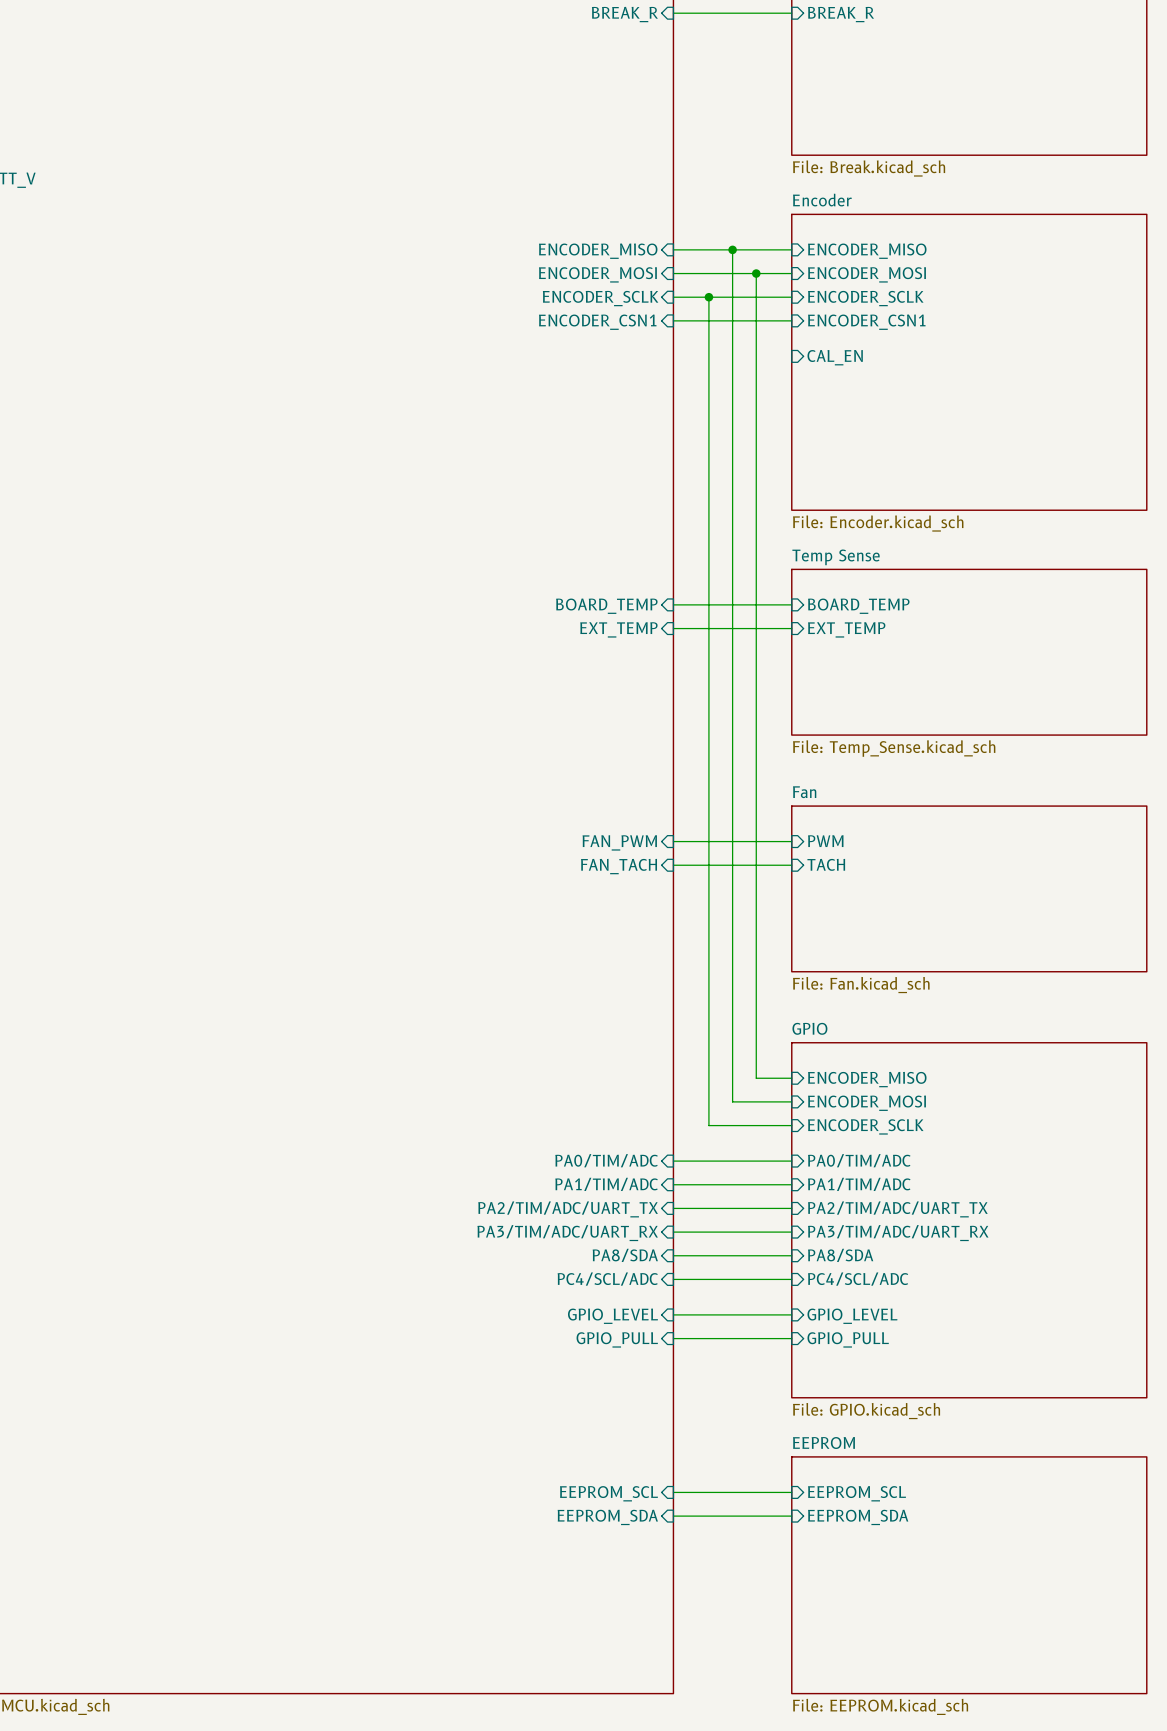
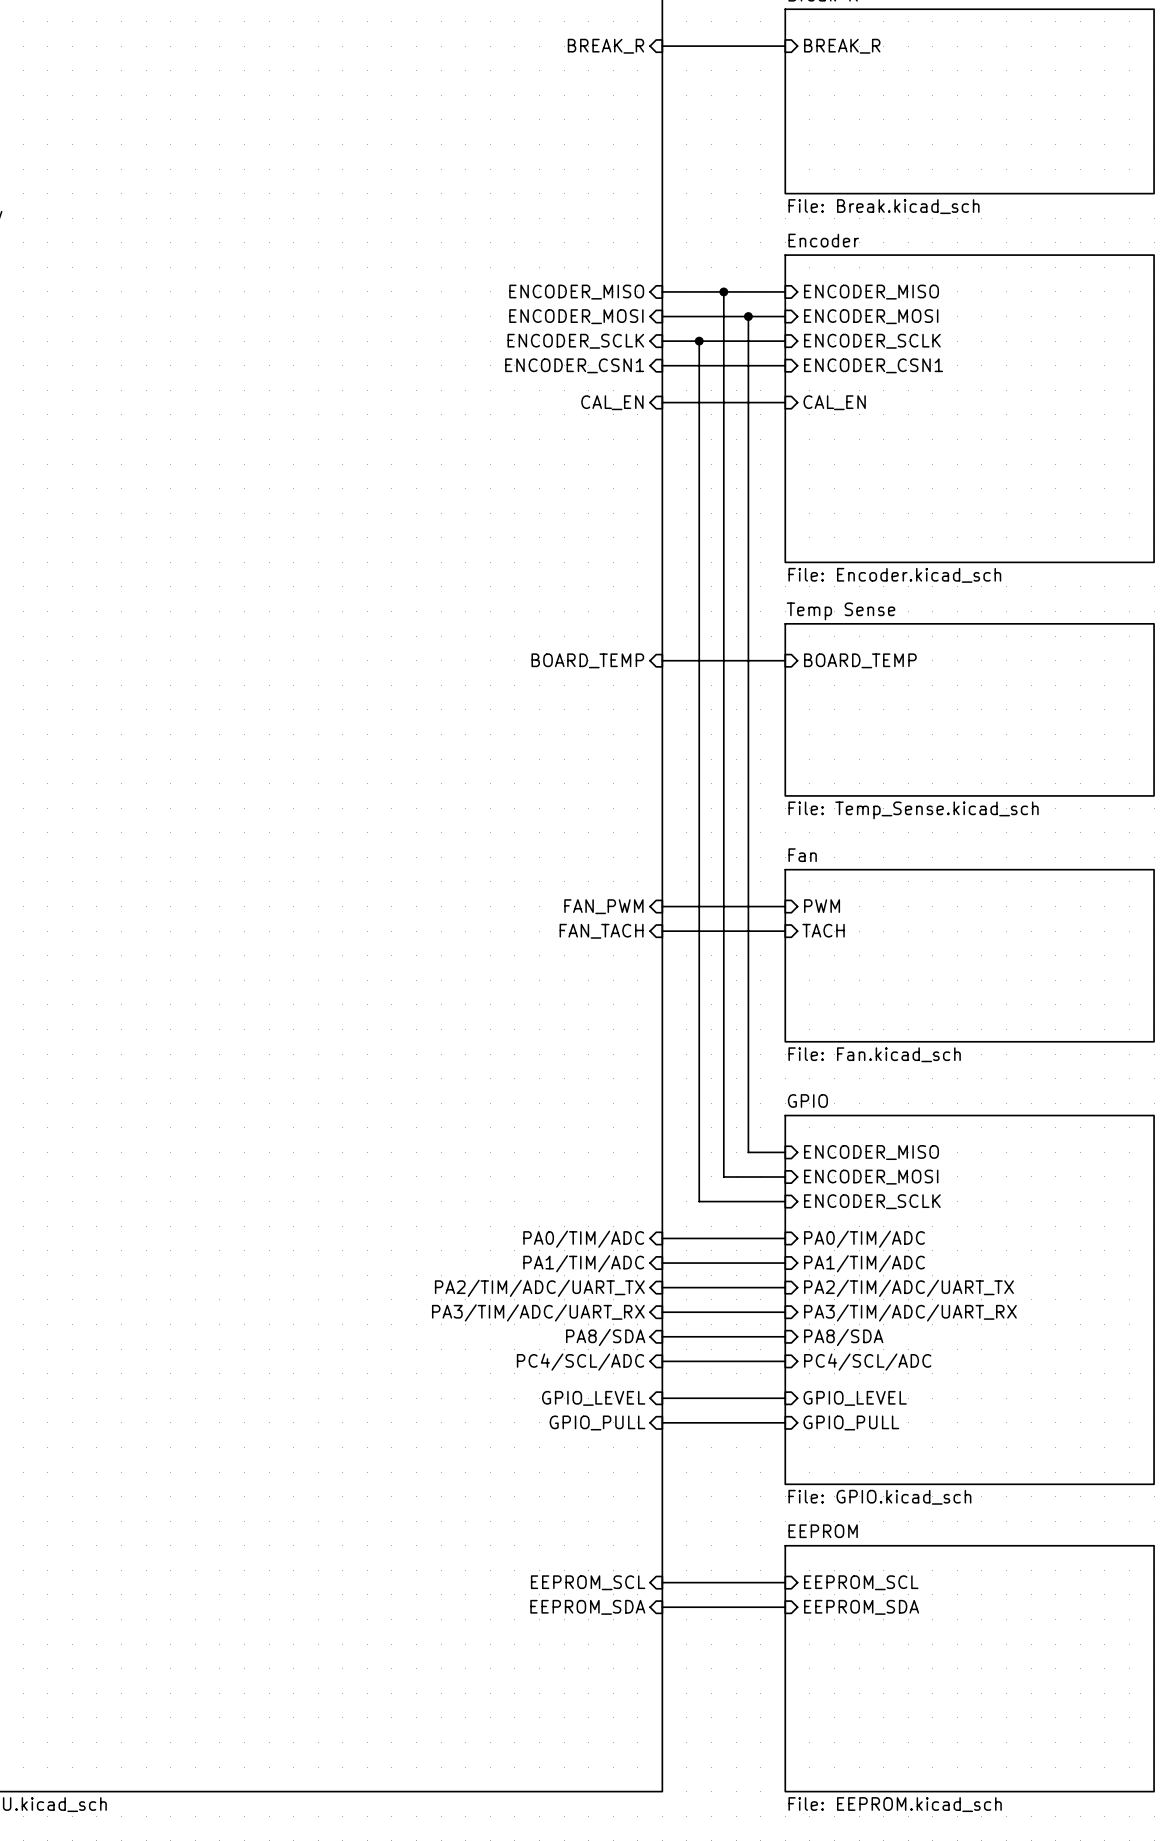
wire: none -> (662, 402) (785, 402)
sheet pin: none -> CAL_EN (612, 402)
wire: (673, 628) (791, 628) -> none
sheet pin: EXT_TEMP (618, 629) -> none
sheet pin: EXT_TEMP (846, 629) -> none

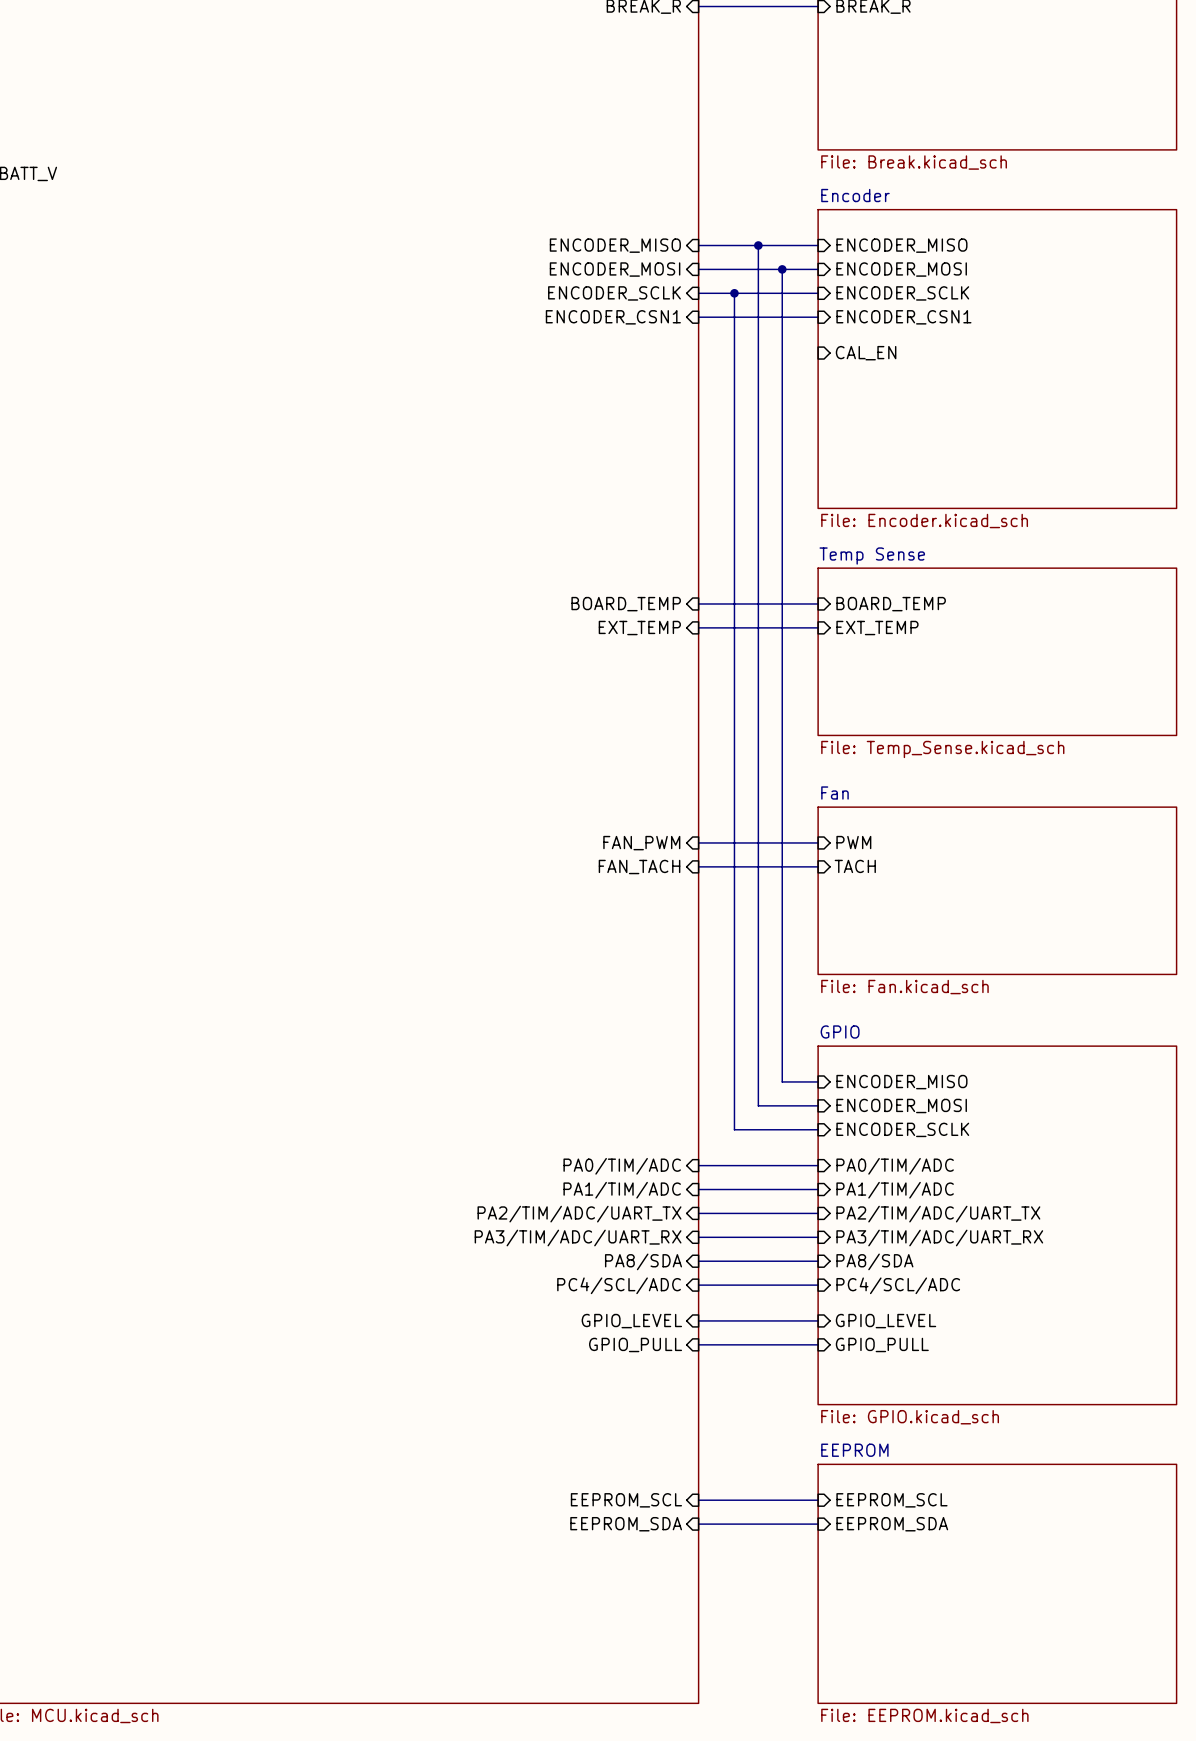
sheet pin: CAL_EN (612, 402) -> none
wire: (662, 402) (785, 402) -> none
sheet pin: none -> EXT_TEMP (639, 628)
wire: none -> (698, 627) (818, 627)
sheet pin: none -> EXT_TEMP (877, 628)

